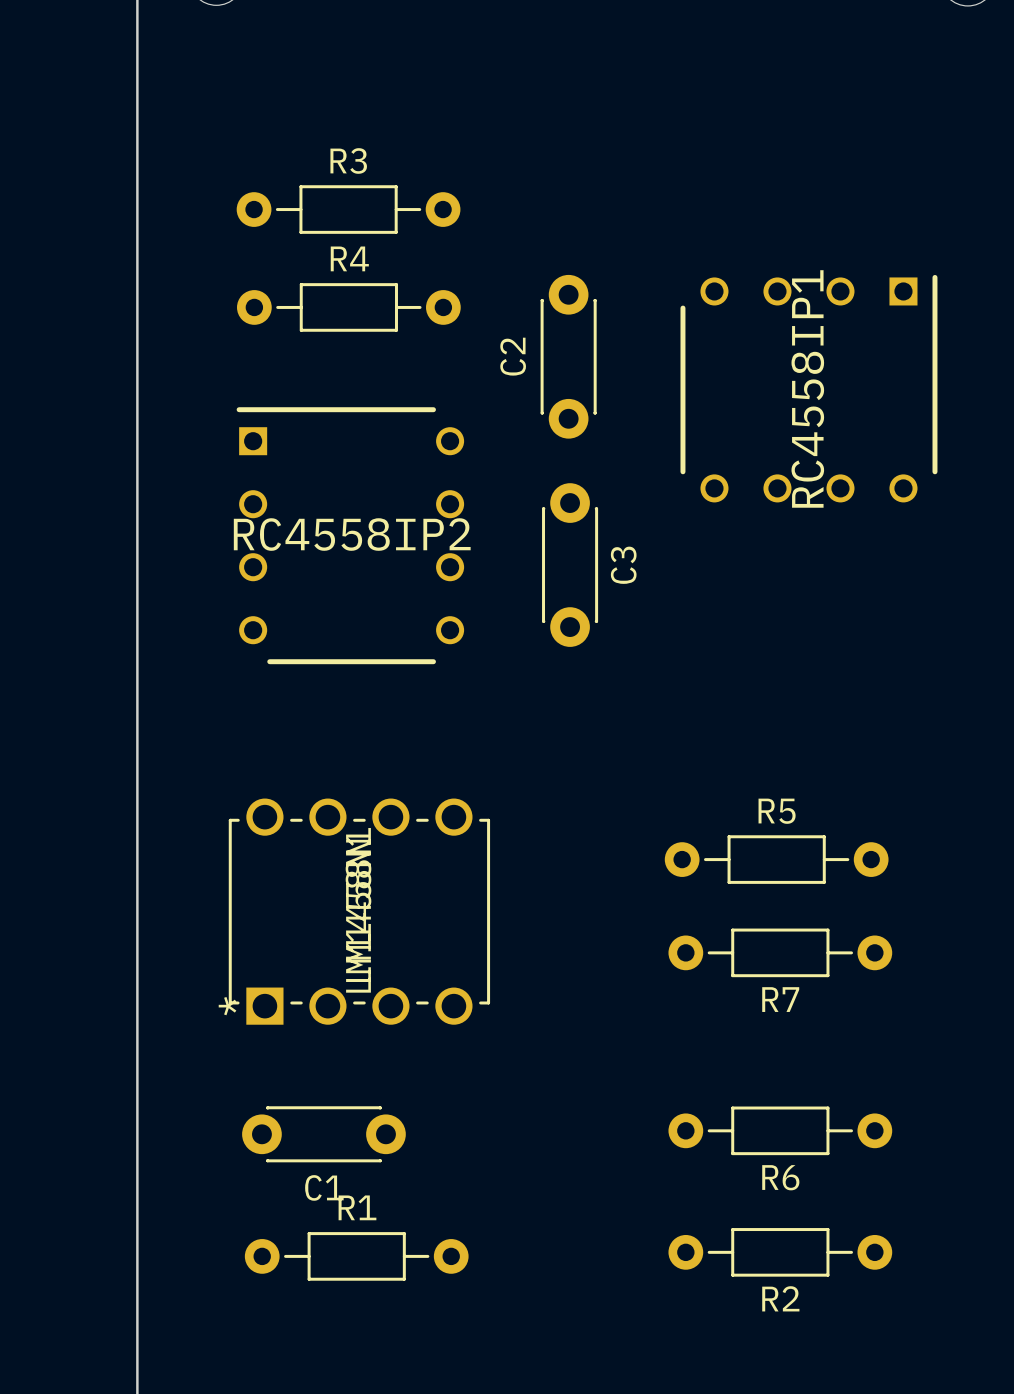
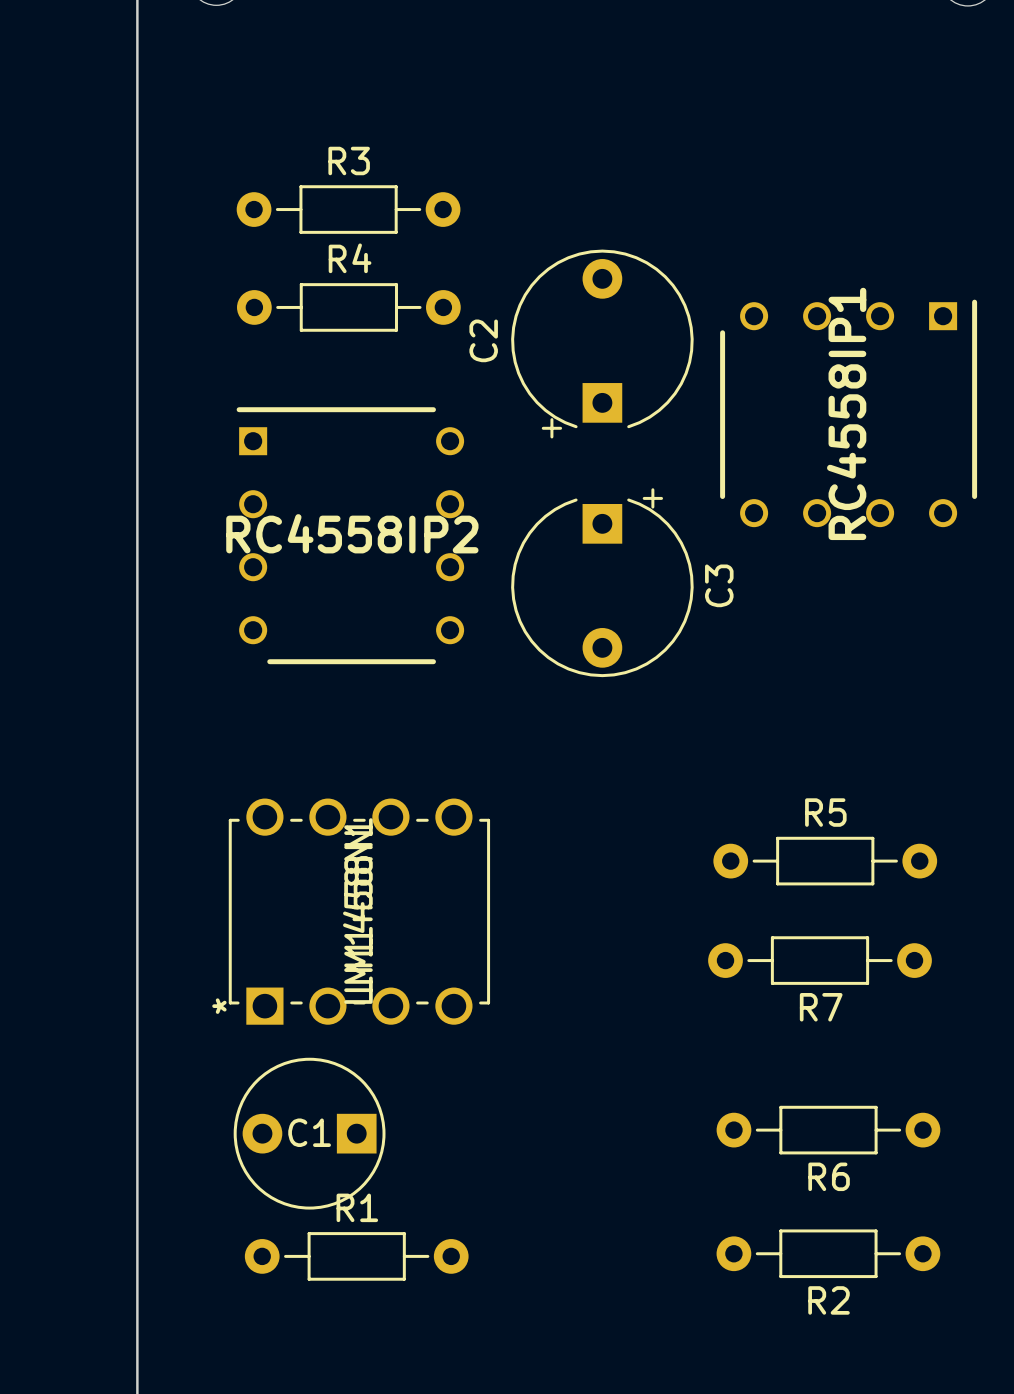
C2 footprint: [540, 274, 597, 439] -> [511, 249, 694, 439]
C2 name position: C2 (513, 356) -> C2 (483, 340)
RC4558IP1 position: (808, 388) -> (848, 413)
C3 footprint: [542, 483, 599, 647] -> [511, 488, 694, 678]
C3 name position: C3 (623, 565) -> C3 (719, 585)
R5 position: (776, 859) -> (825, 861)
R7 position: (780, 952) -> (820, 960)
C1 footprint: [242, 1106, 406, 1163] -> [233, 1057, 386, 1210]
R6 position: (780, 1130) -> (828, 1130)
C1 name position: C1 (324, 1187) -> C1 (309, 1132)
R2 position: (780, 1252) -> (828, 1253)

